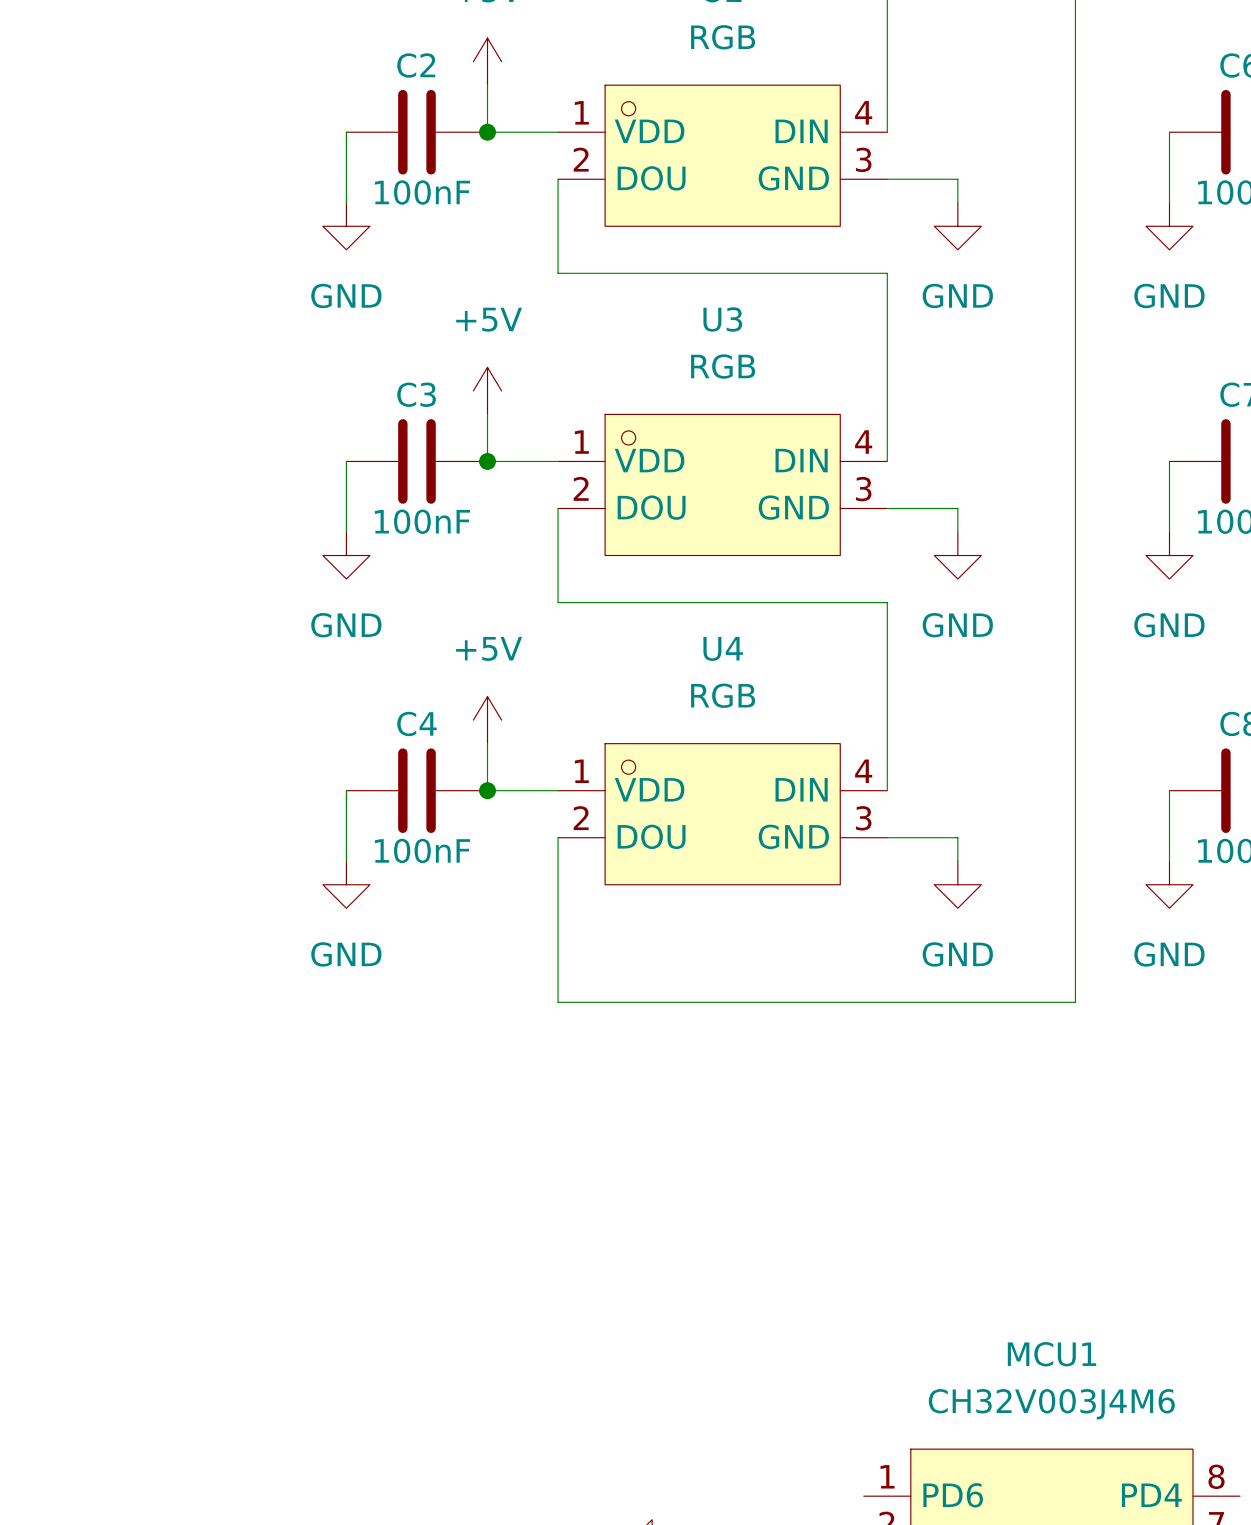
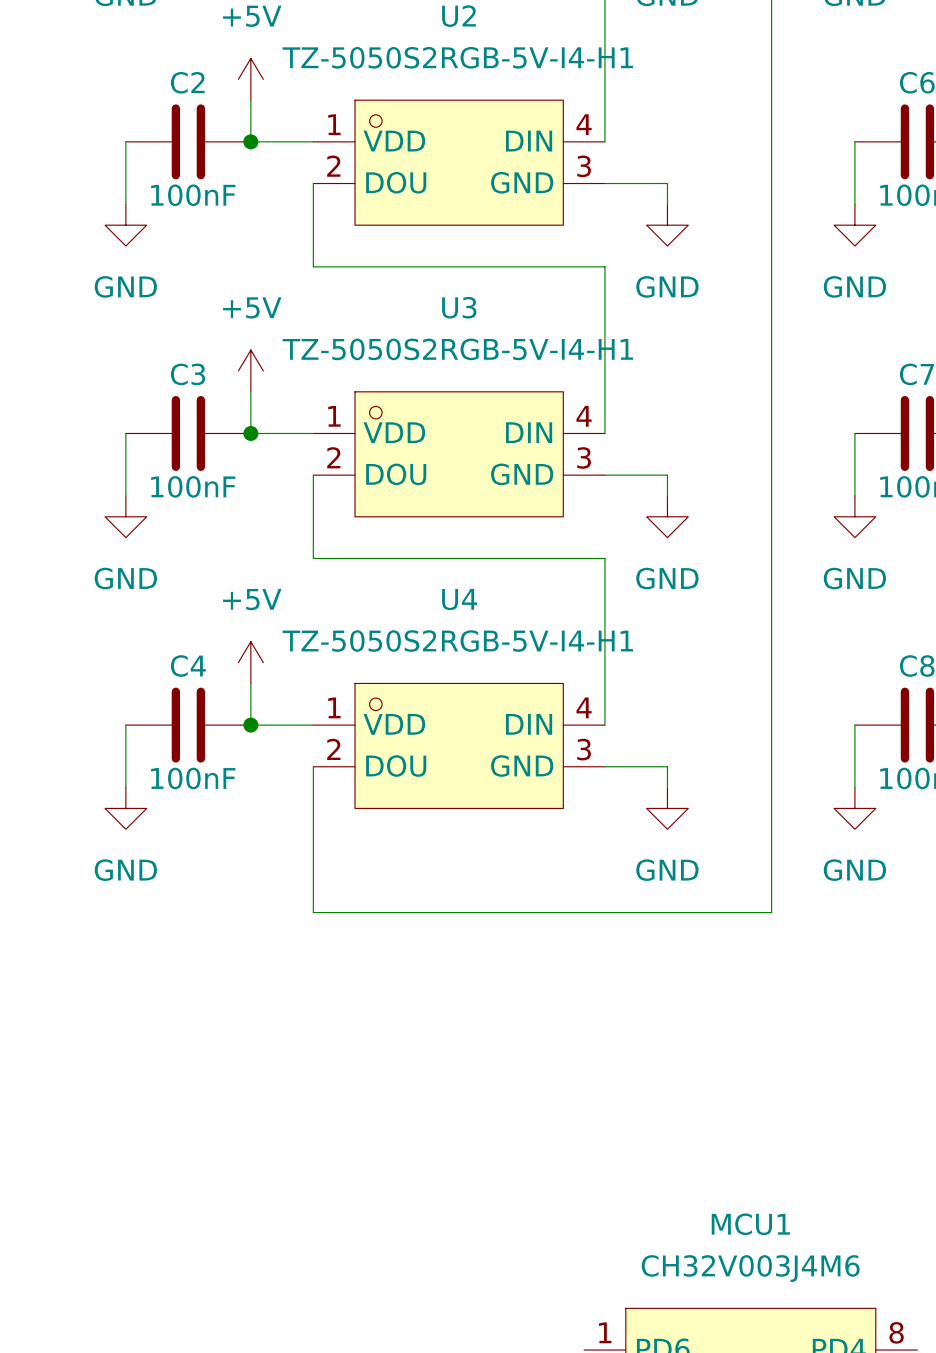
U2 value: RGB (723, 37) -> TZ-5050S2RGB-5V-I4-H1 (457, 57)
U3 value: RGB (723, 366) -> TZ-5050S2RGB-5V-I4-H1 (457, 349)
U4 value: RGB (723, 695) -> TZ-5050S2RGB-5V-I4-H1 (457, 641)

